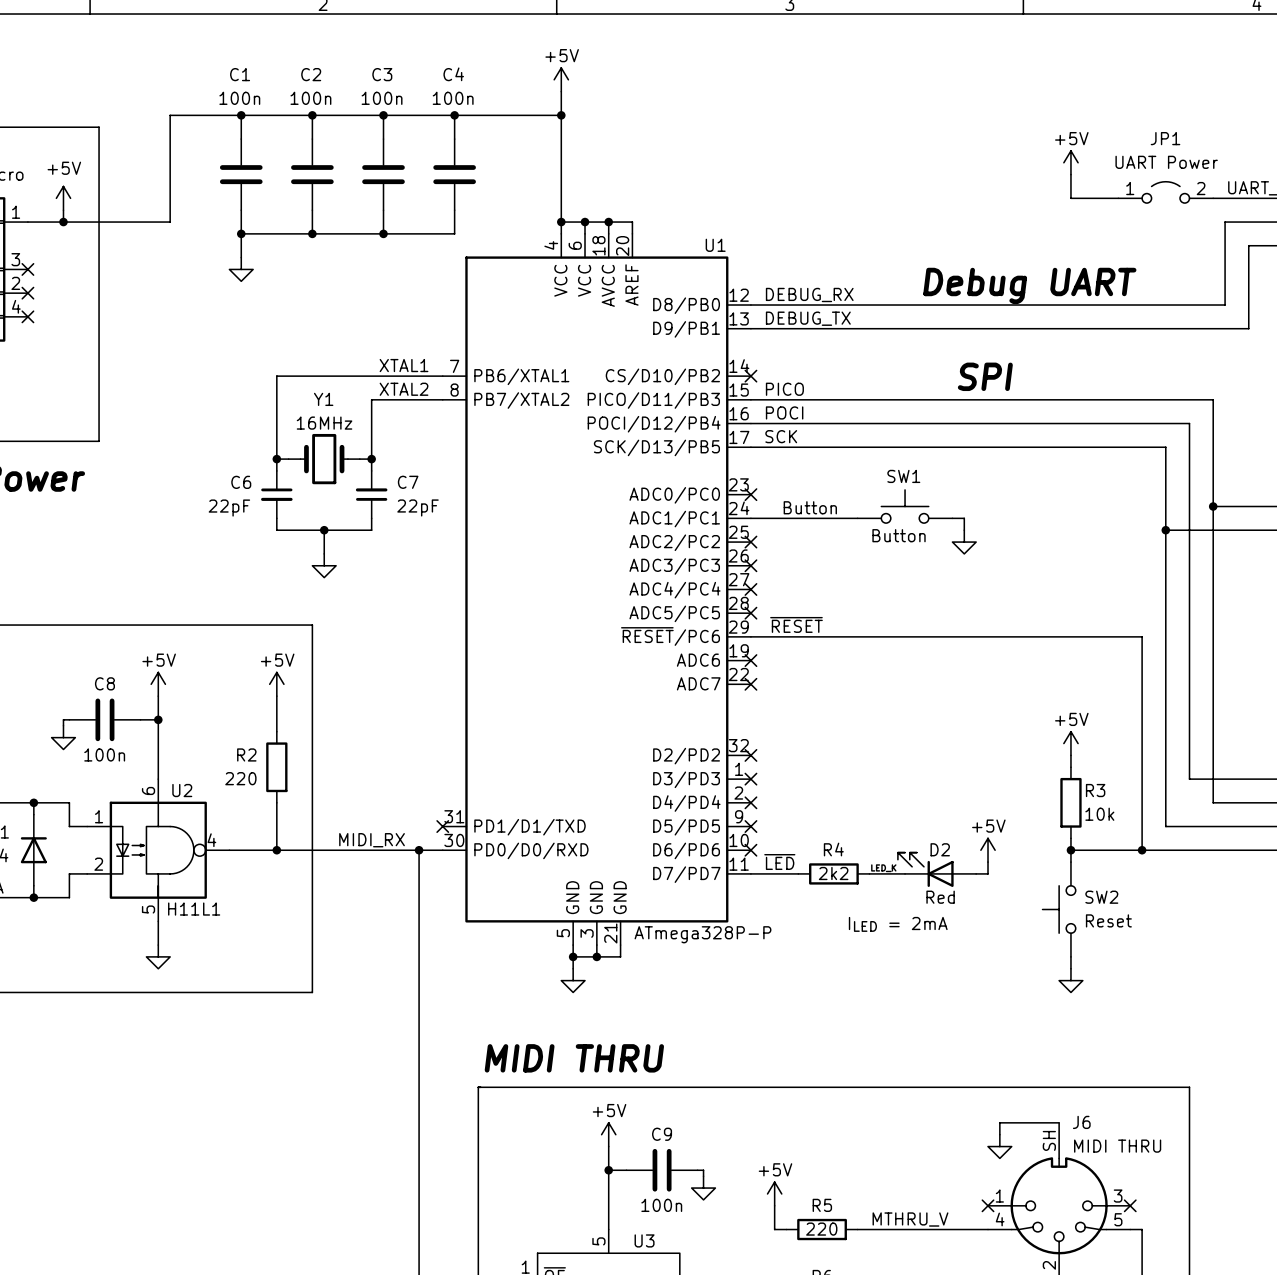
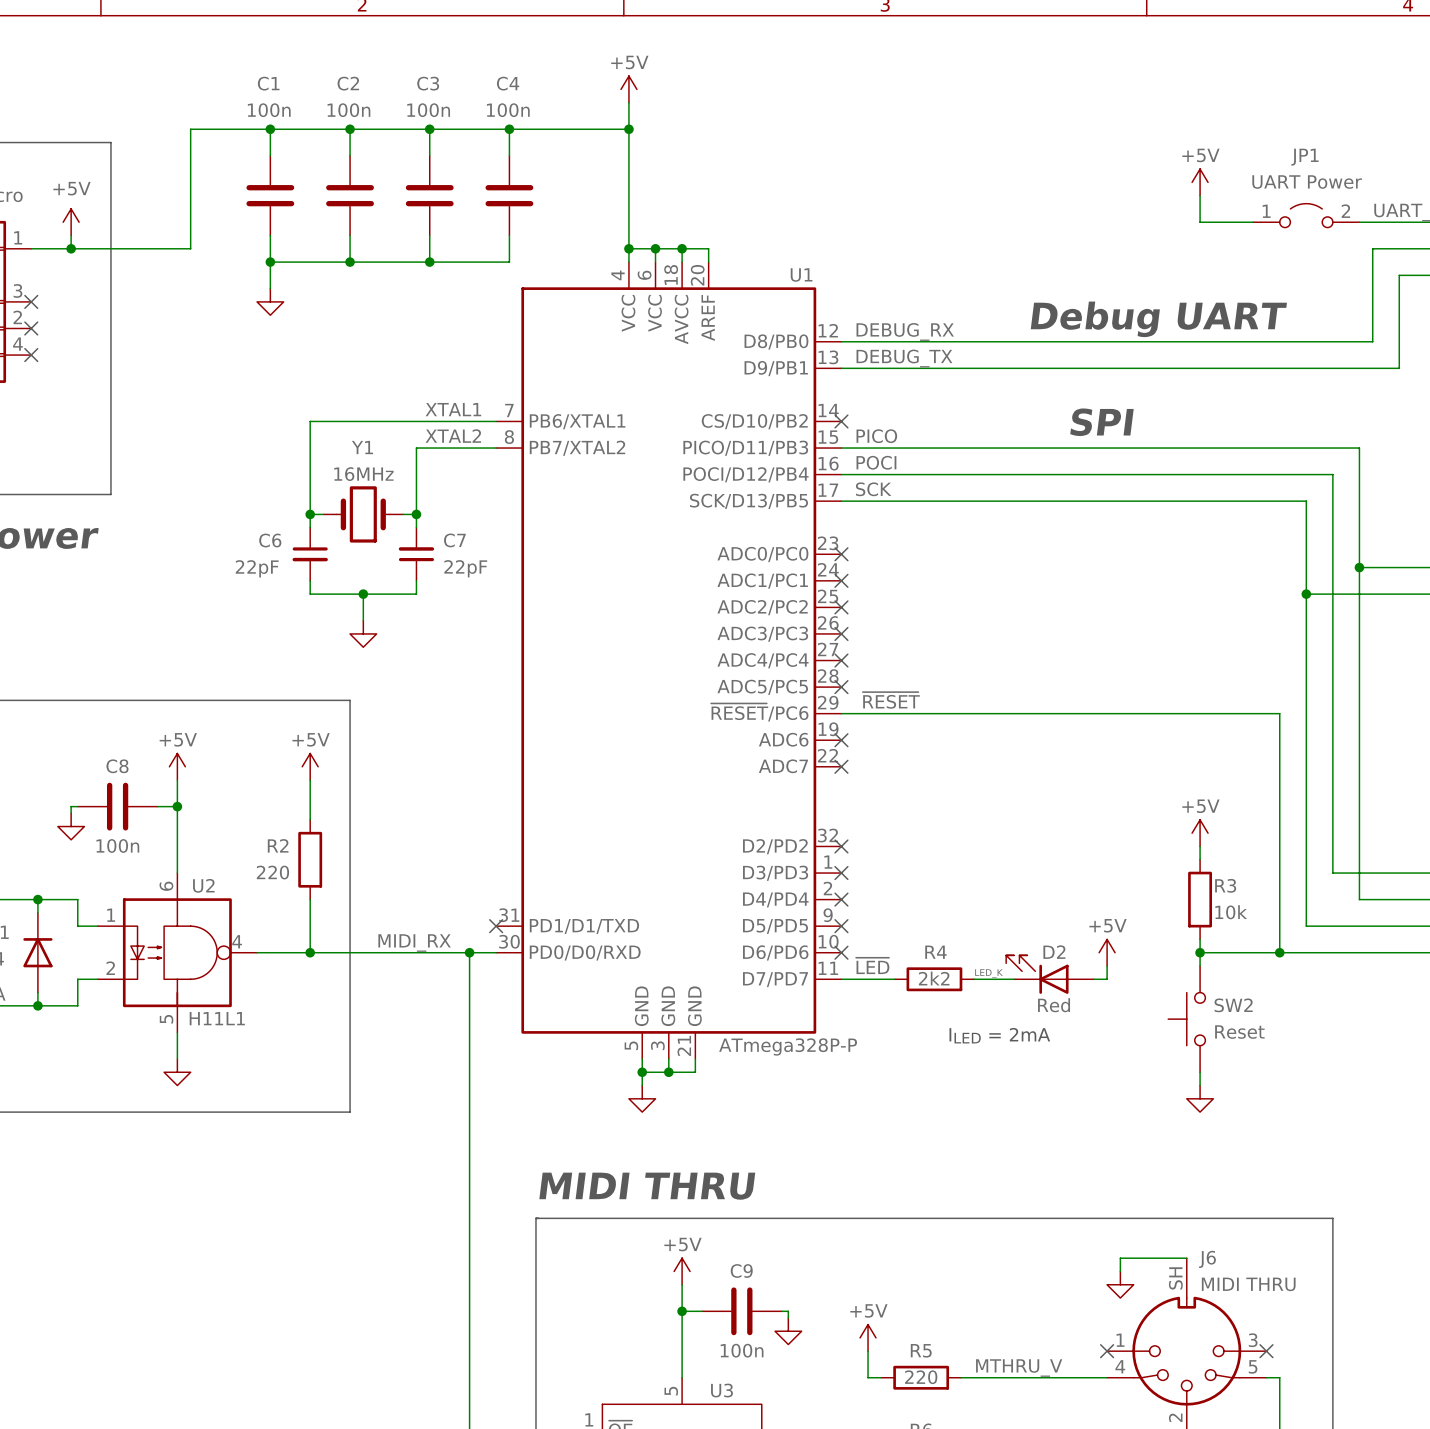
SW1: Button (905, 506) -> none
label: Button (810, 507) -> none
wire: (750, 518) (857, 518) -> none
no-connect mark: none -> (841, 580)
wire: (952, 518) (964, 518) (964, 530) -> none
power symbol: (964, 542) -> none

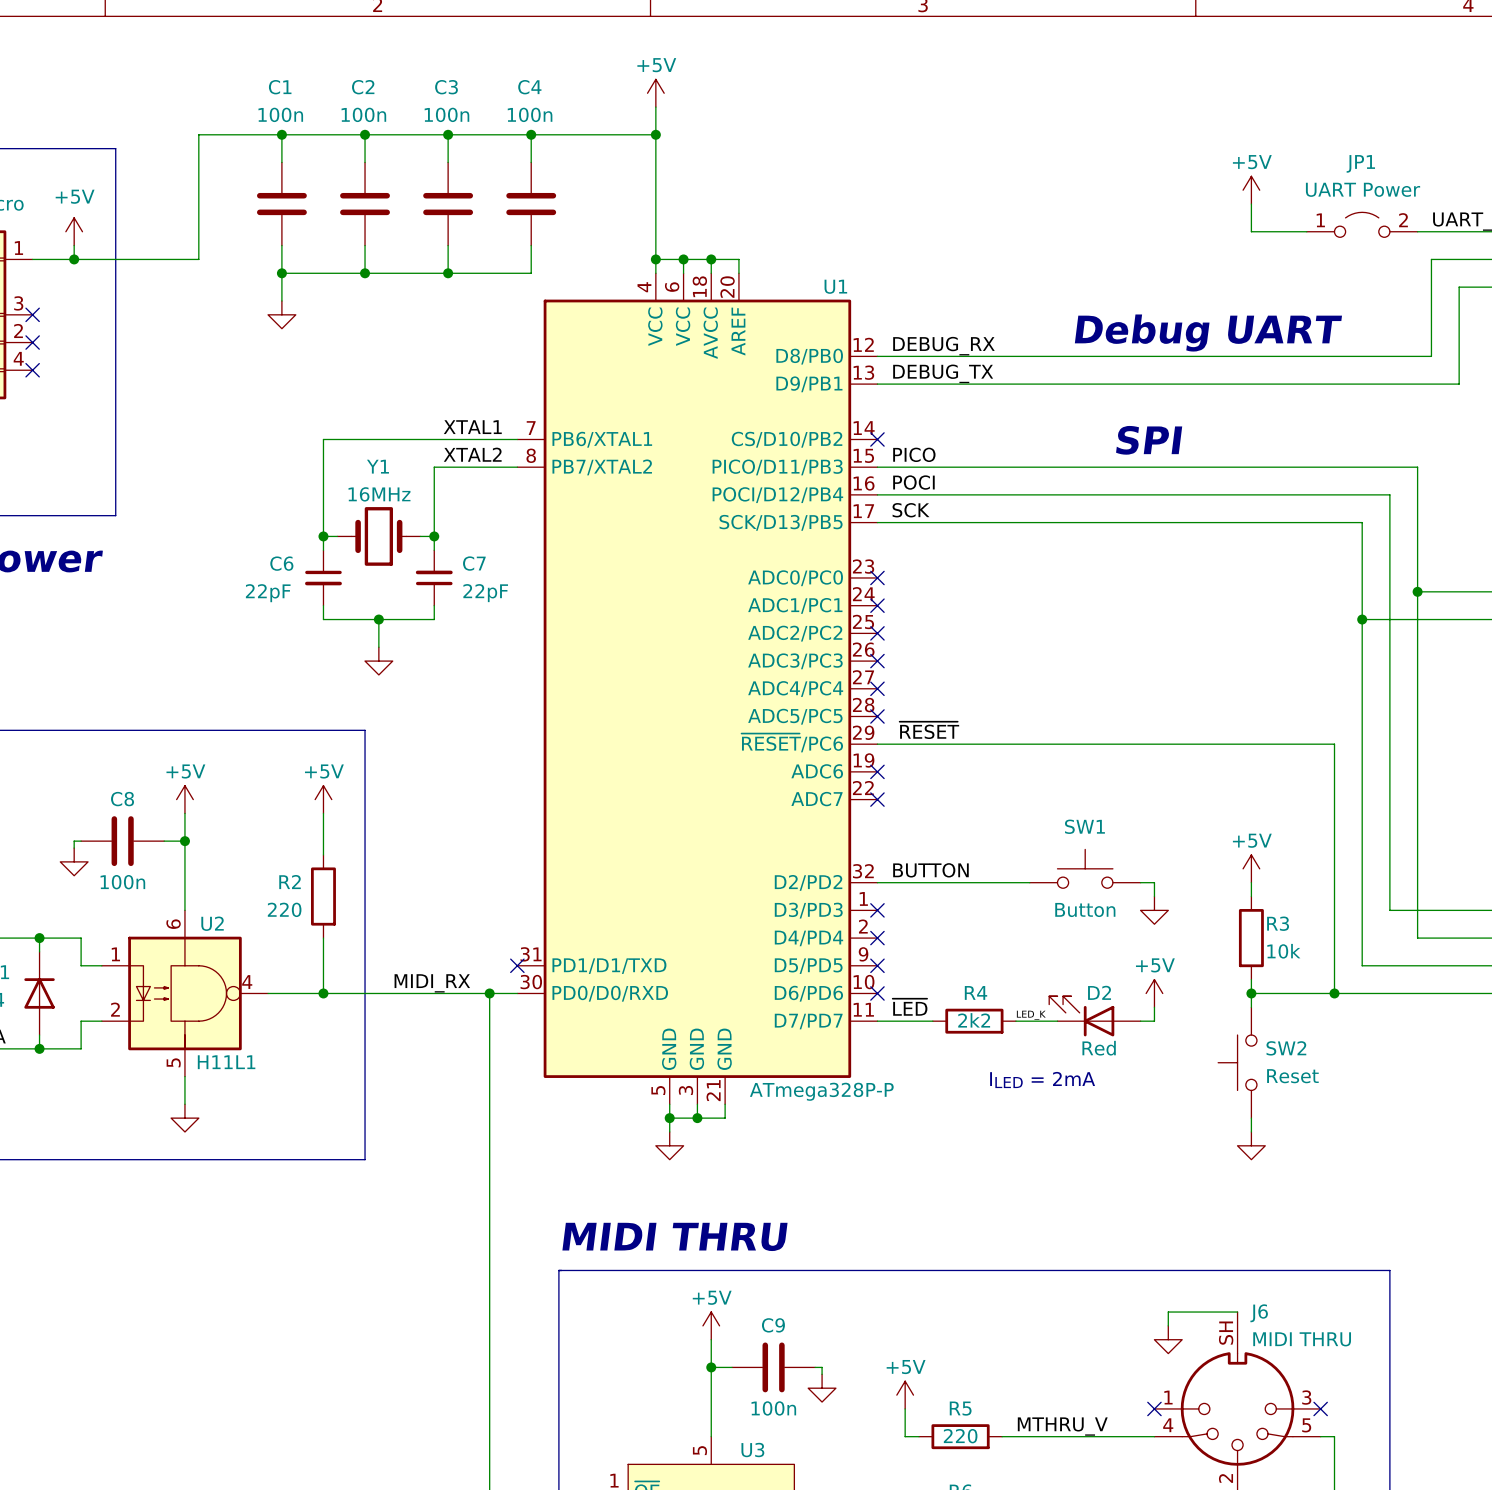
SW1: none -> Button (1085, 868)
label: none -> BUTTON (930, 870)
wire: none -> (877, 882) (1029, 882)
no-connect mark: (841, 846) -> none
wire: none -> (1140, 882) (1154, 882) (1154, 896)
power symbol: none -> (1154, 910)

